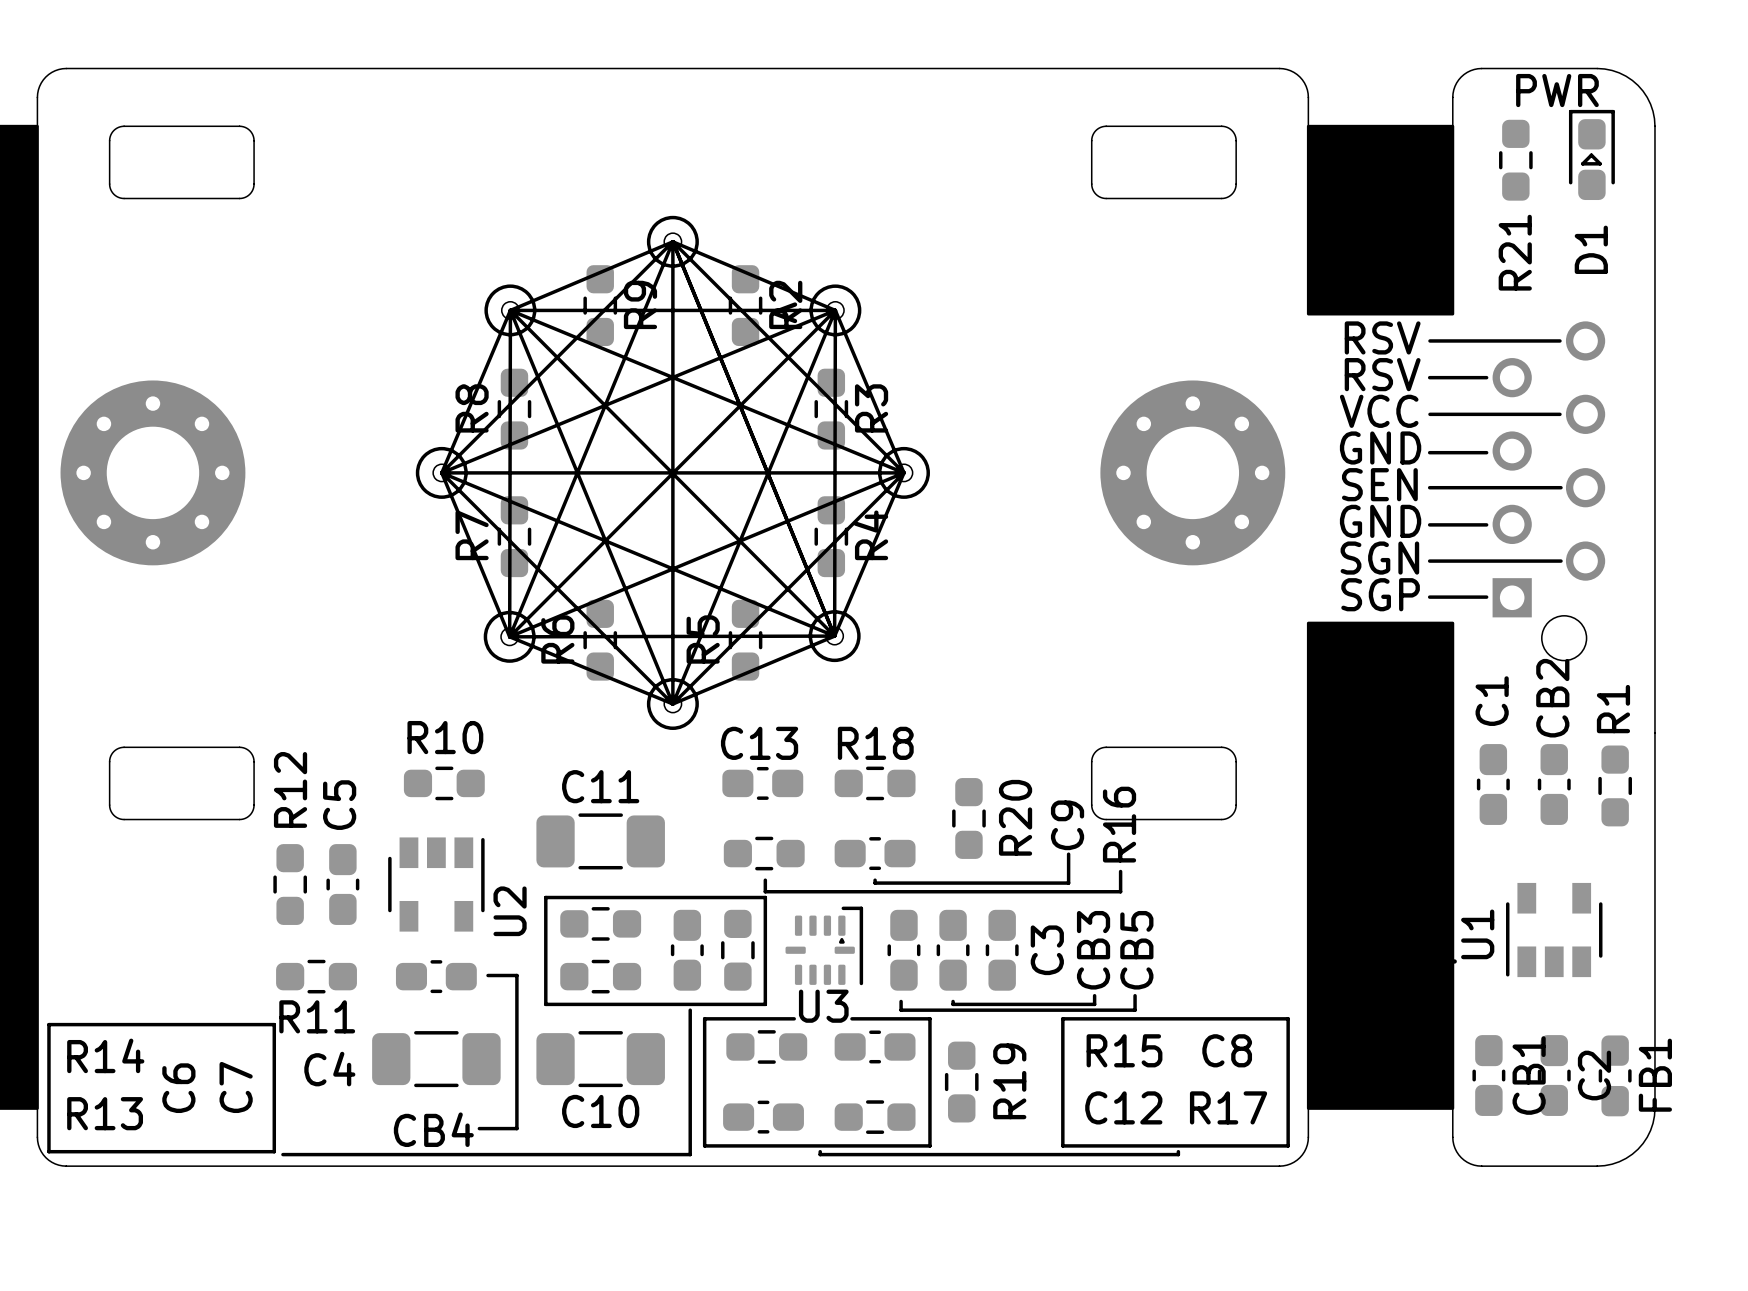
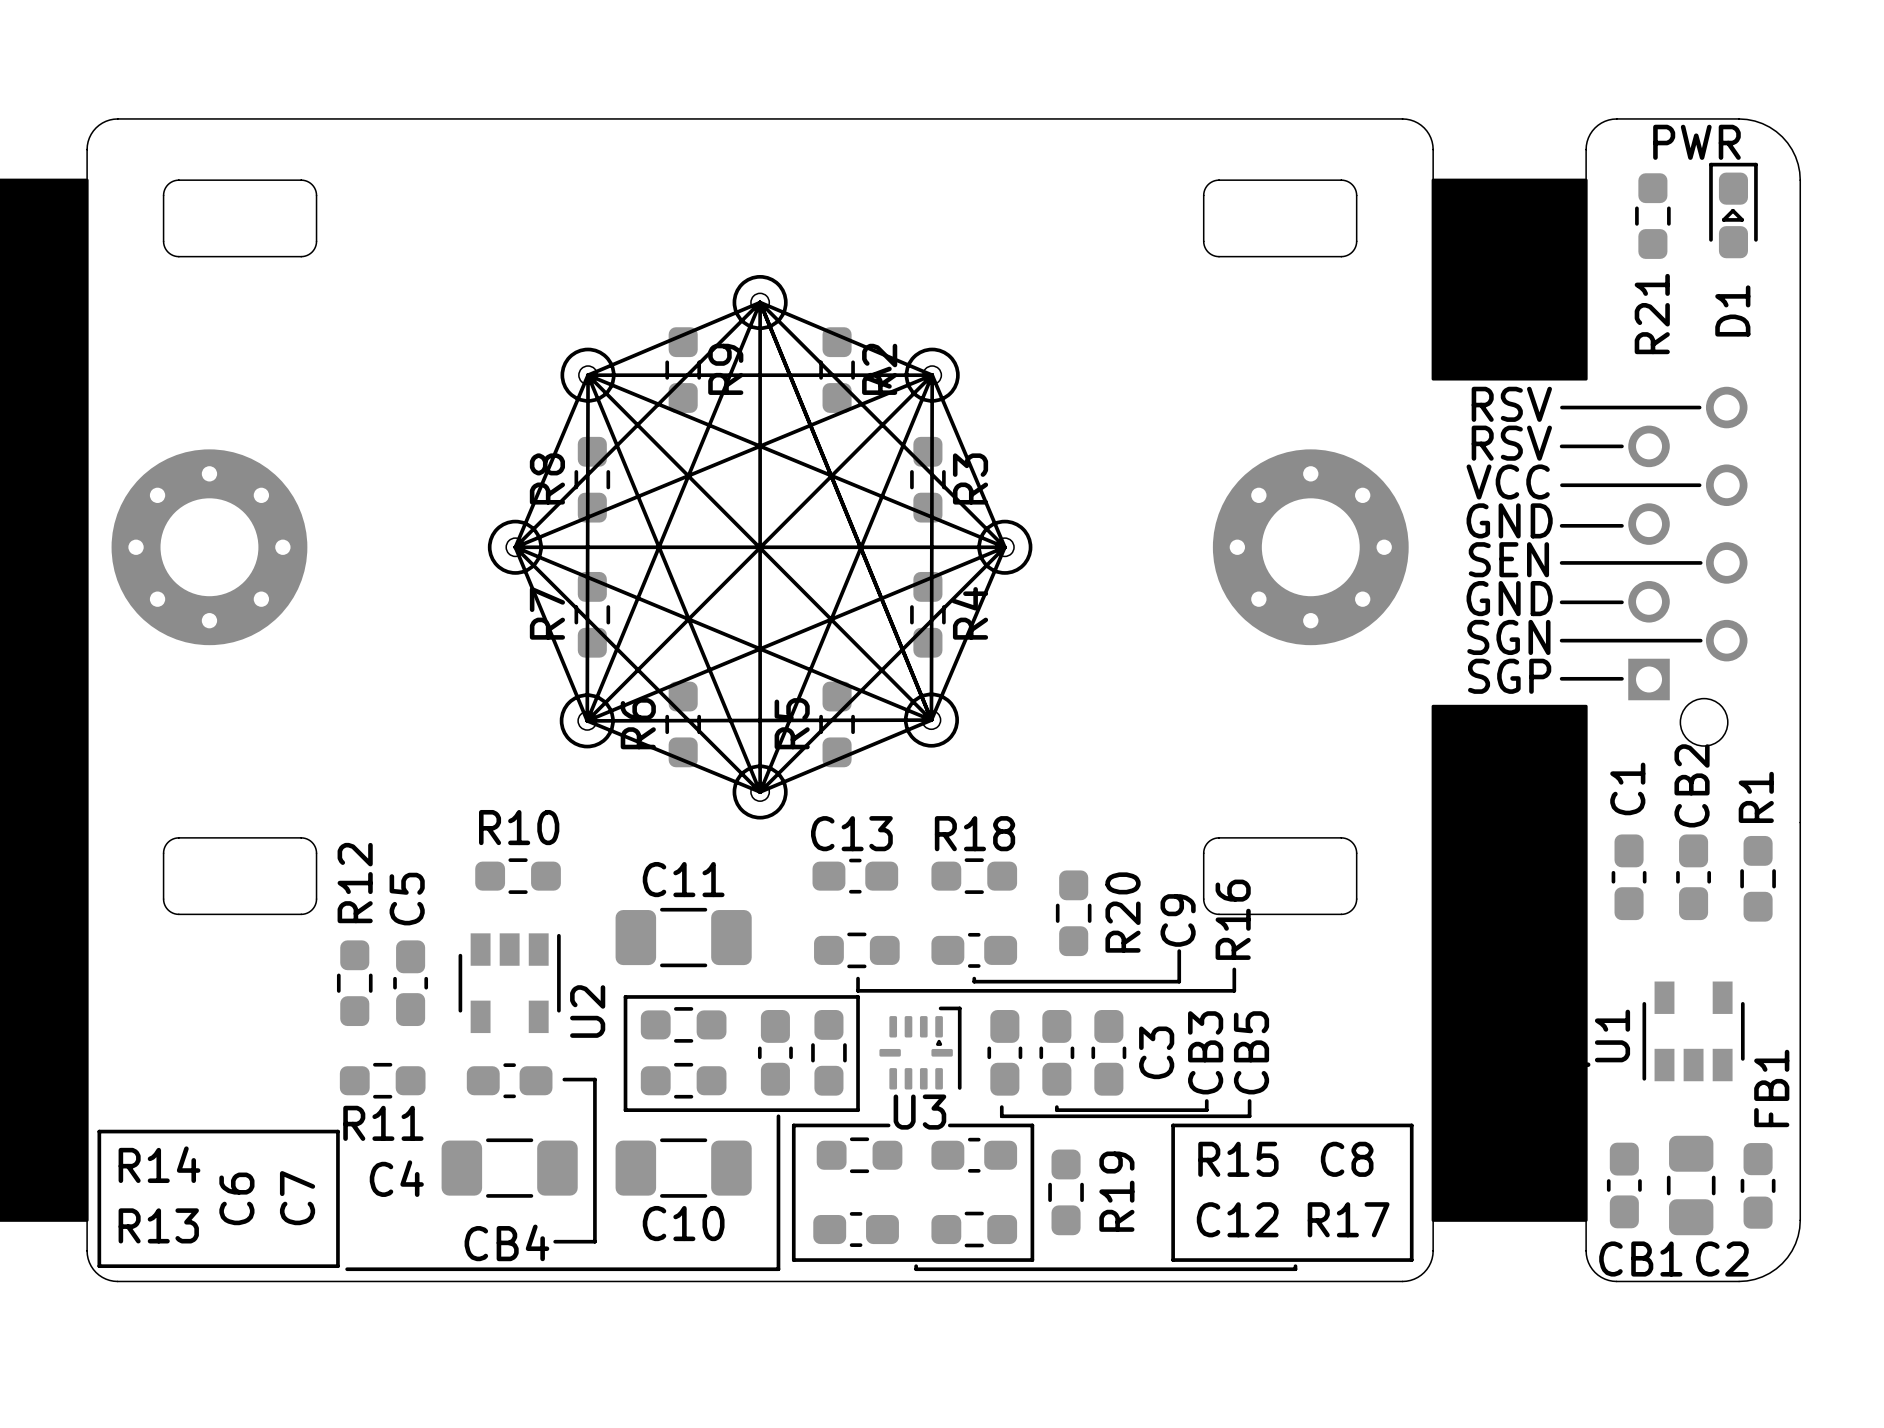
C2 footprint: [1537, 1035, 1571, 1116] -> [1666, 1135, 1716, 1236]
CB1 name rotation: 0° (1529, 1075) -> 90° clockwise (1640, 1259)
C2 name rotation: 0° (1594, 1075) -> 90° clockwise (1722, 1259)
C2 name position: C2 (1594, 1075) -> C2 (1722, 1259)
FB1 name position: FB1 (1655, 1075) -> FB1 (1771, 1088)

